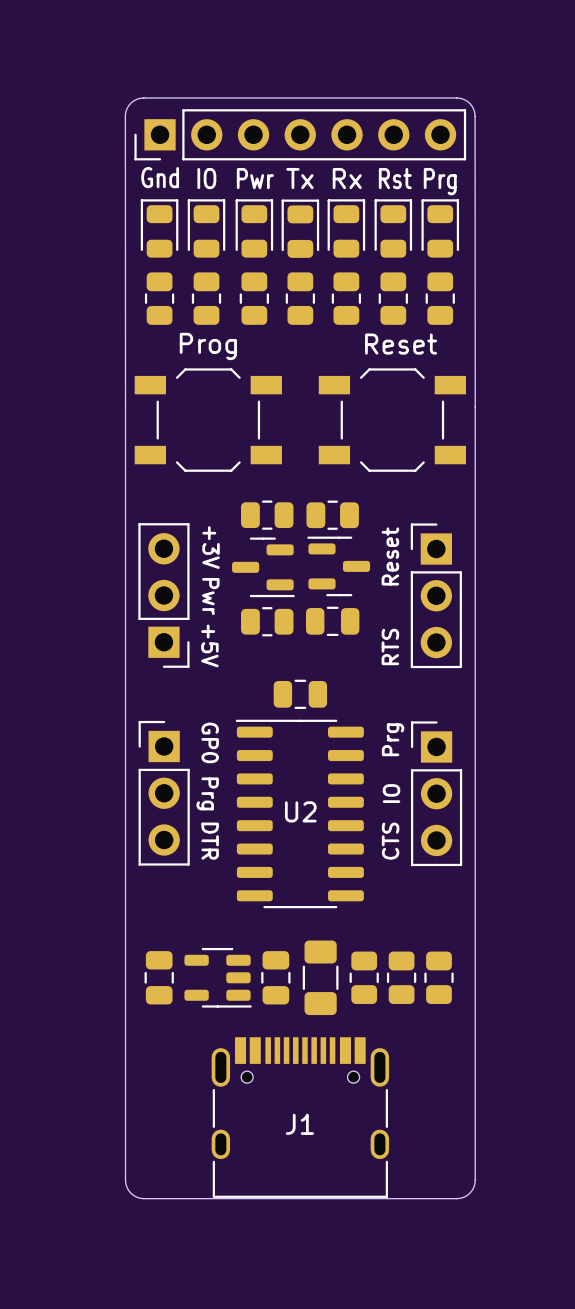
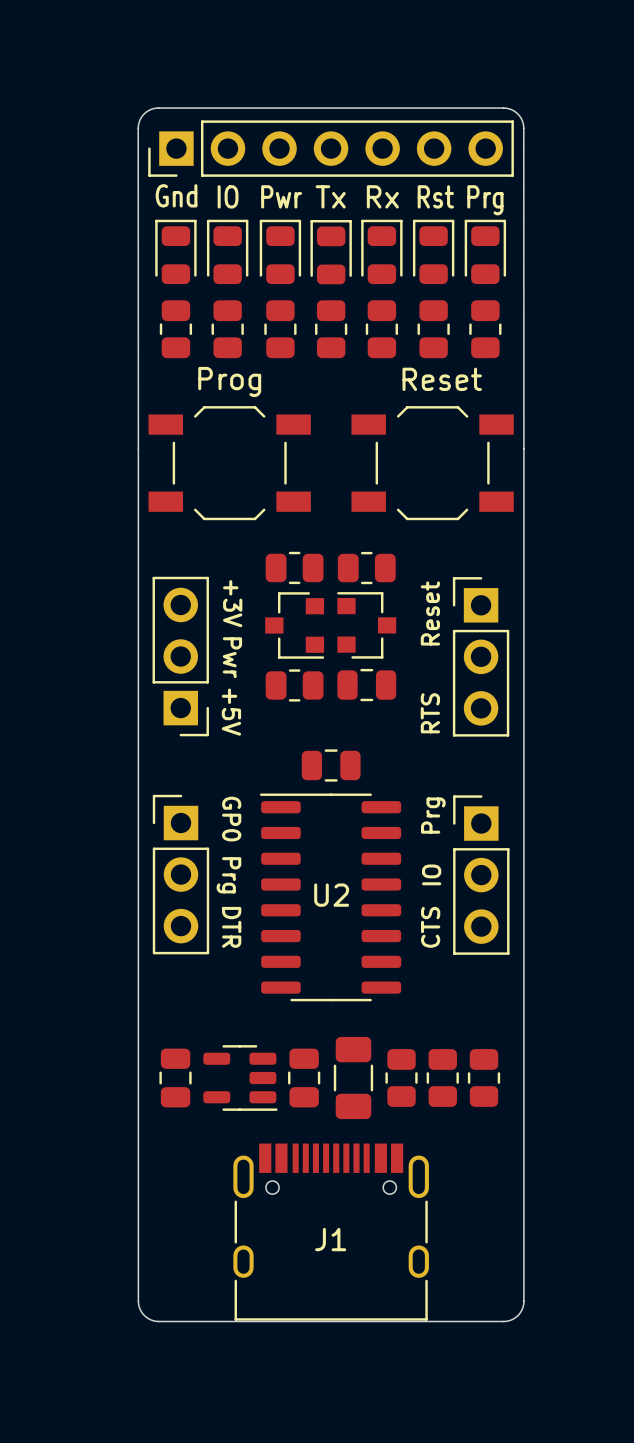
part footprint: [307, 536, 371, 597] -> [337, 592, 397, 659]
part footprint: [232, 537, 295, 598] -> [265, 592, 325, 659]

